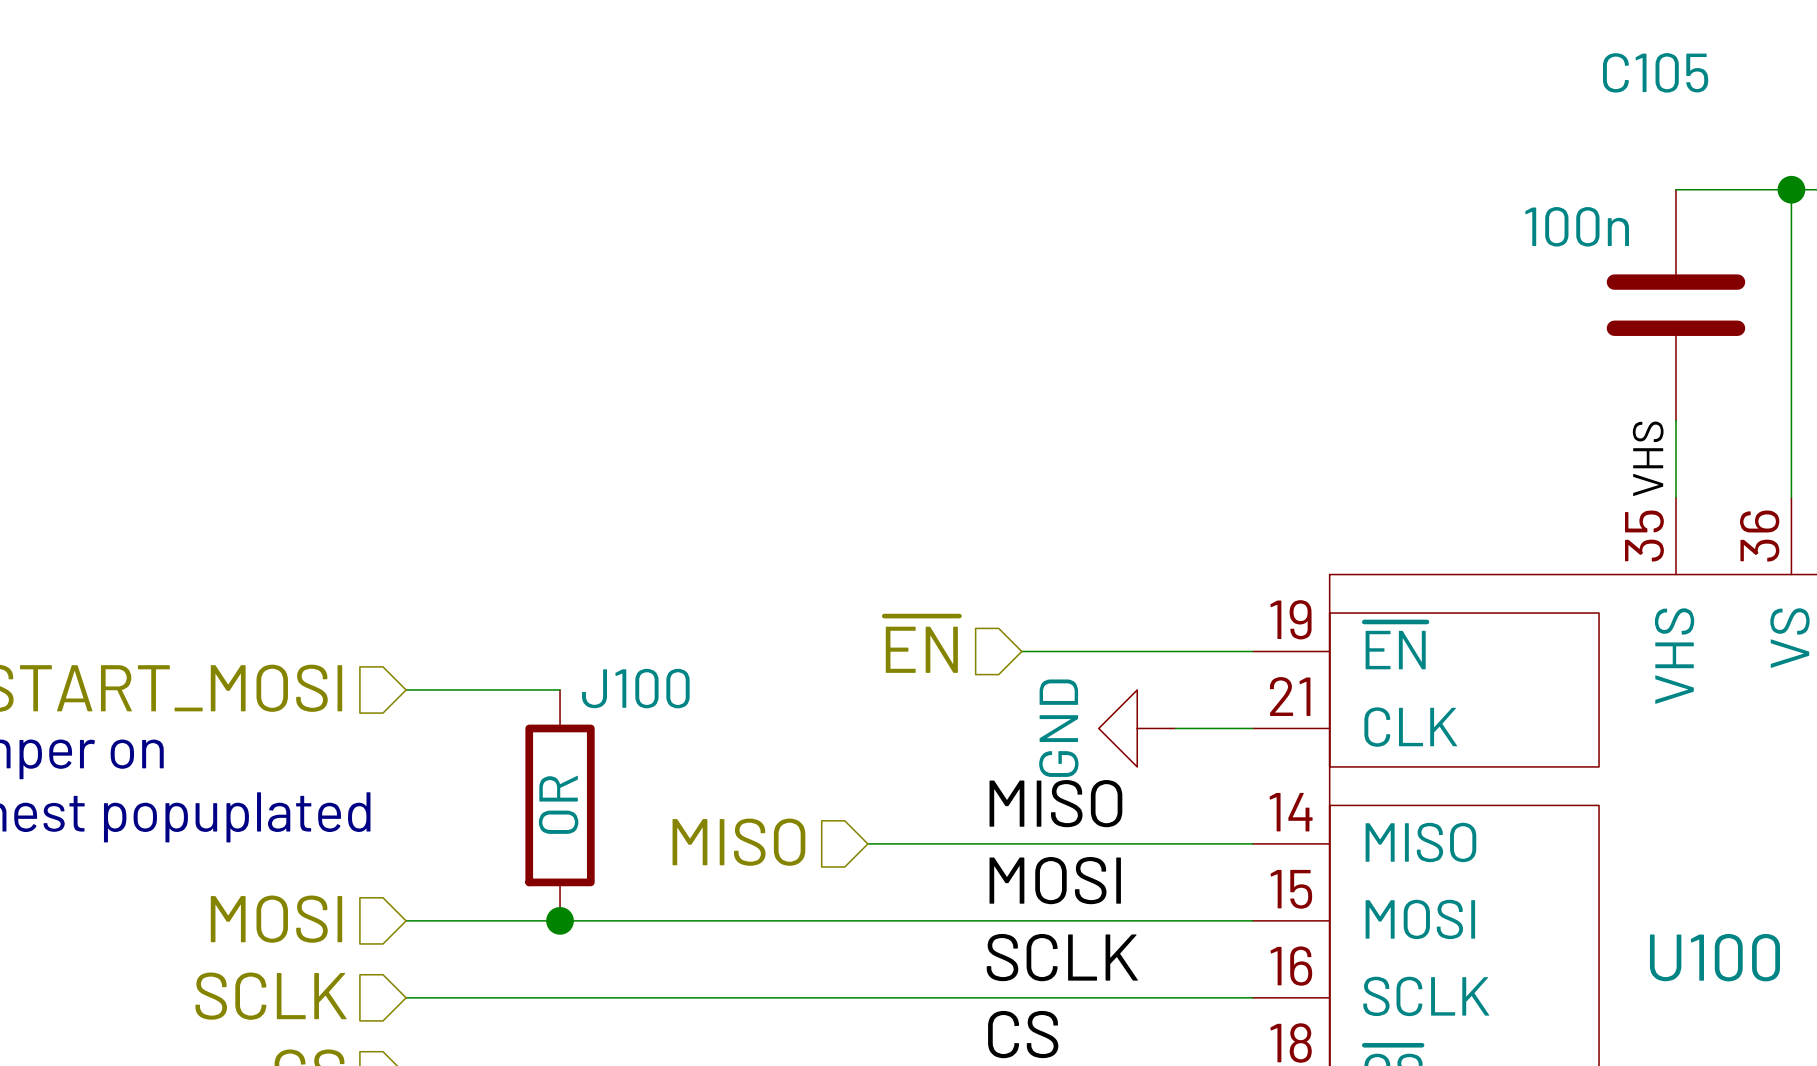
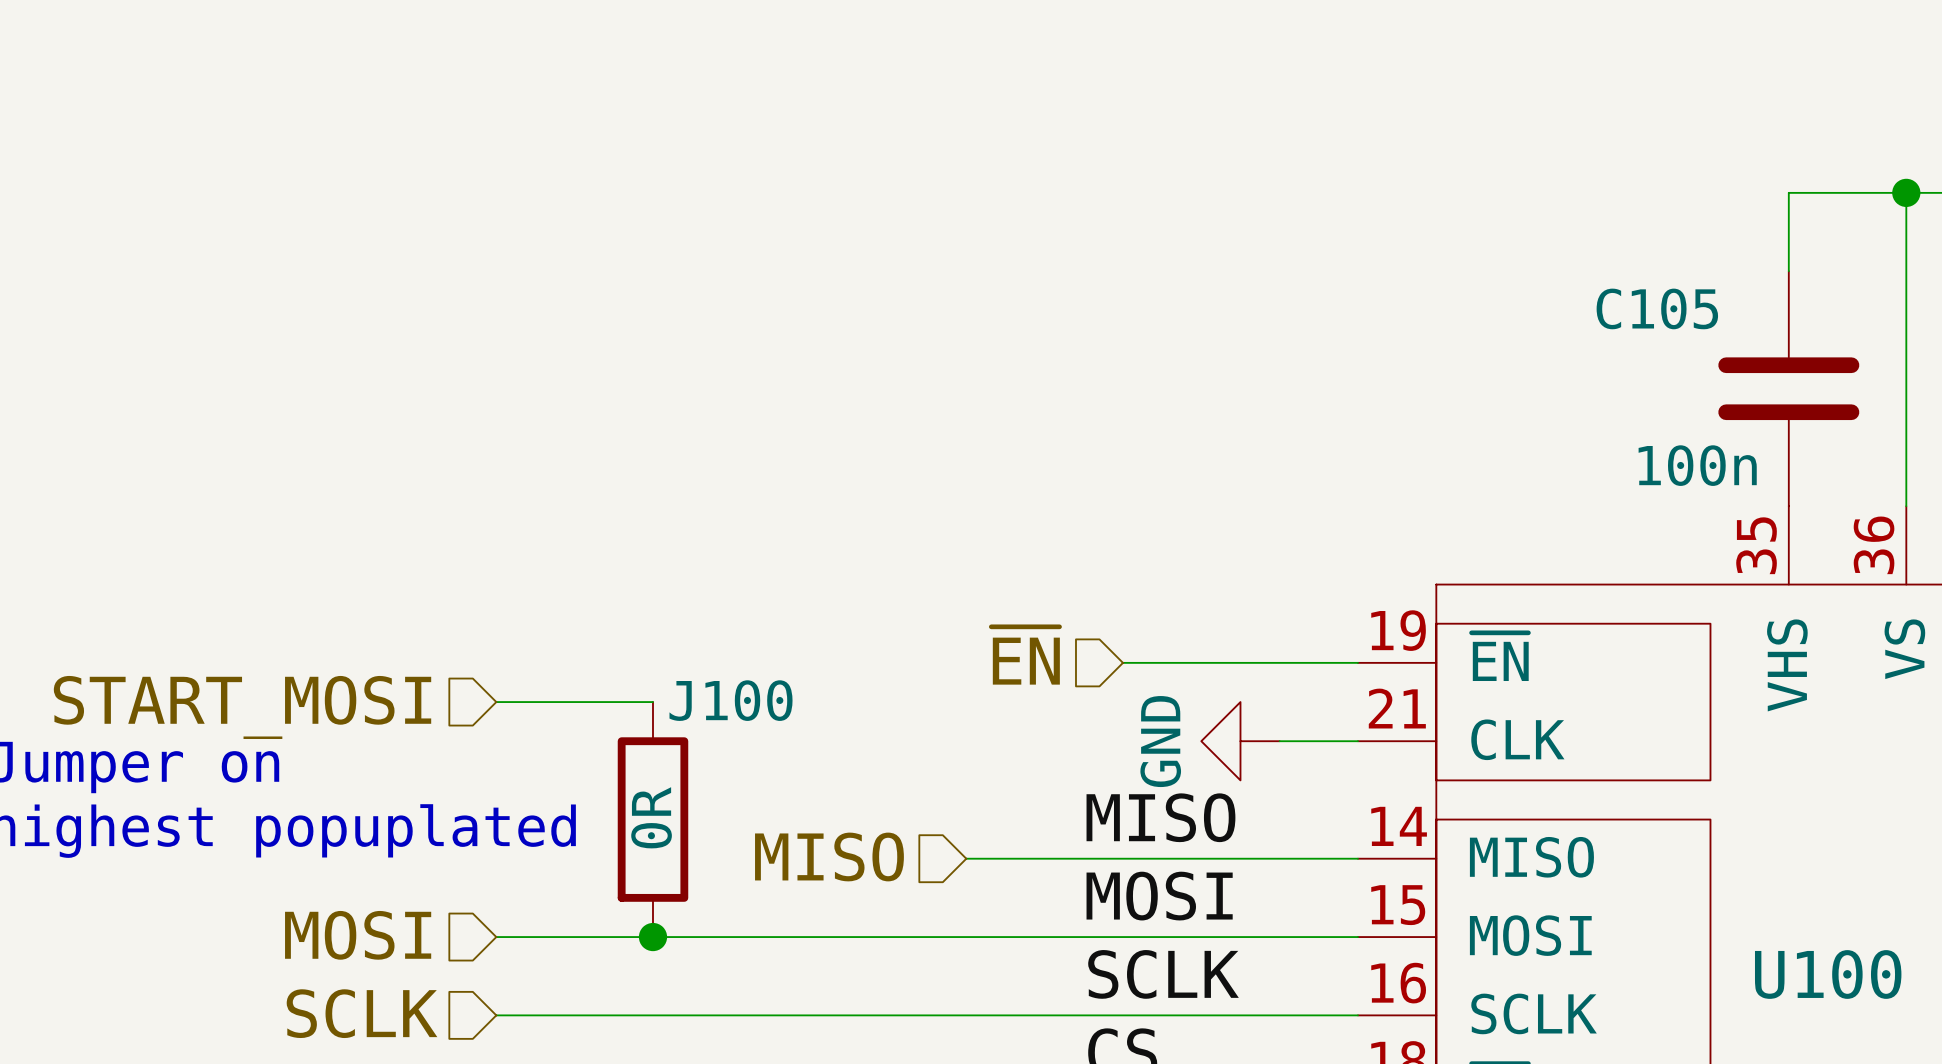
C105 name position: C105 (1655, 72) -> C105 (1657, 308)
C105 value position: 100n (1577, 226) -> 100n (1697, 465)
C105 position: (1675, 305) -> (1788, 388)
label: VHS (1648, 458) -> none

